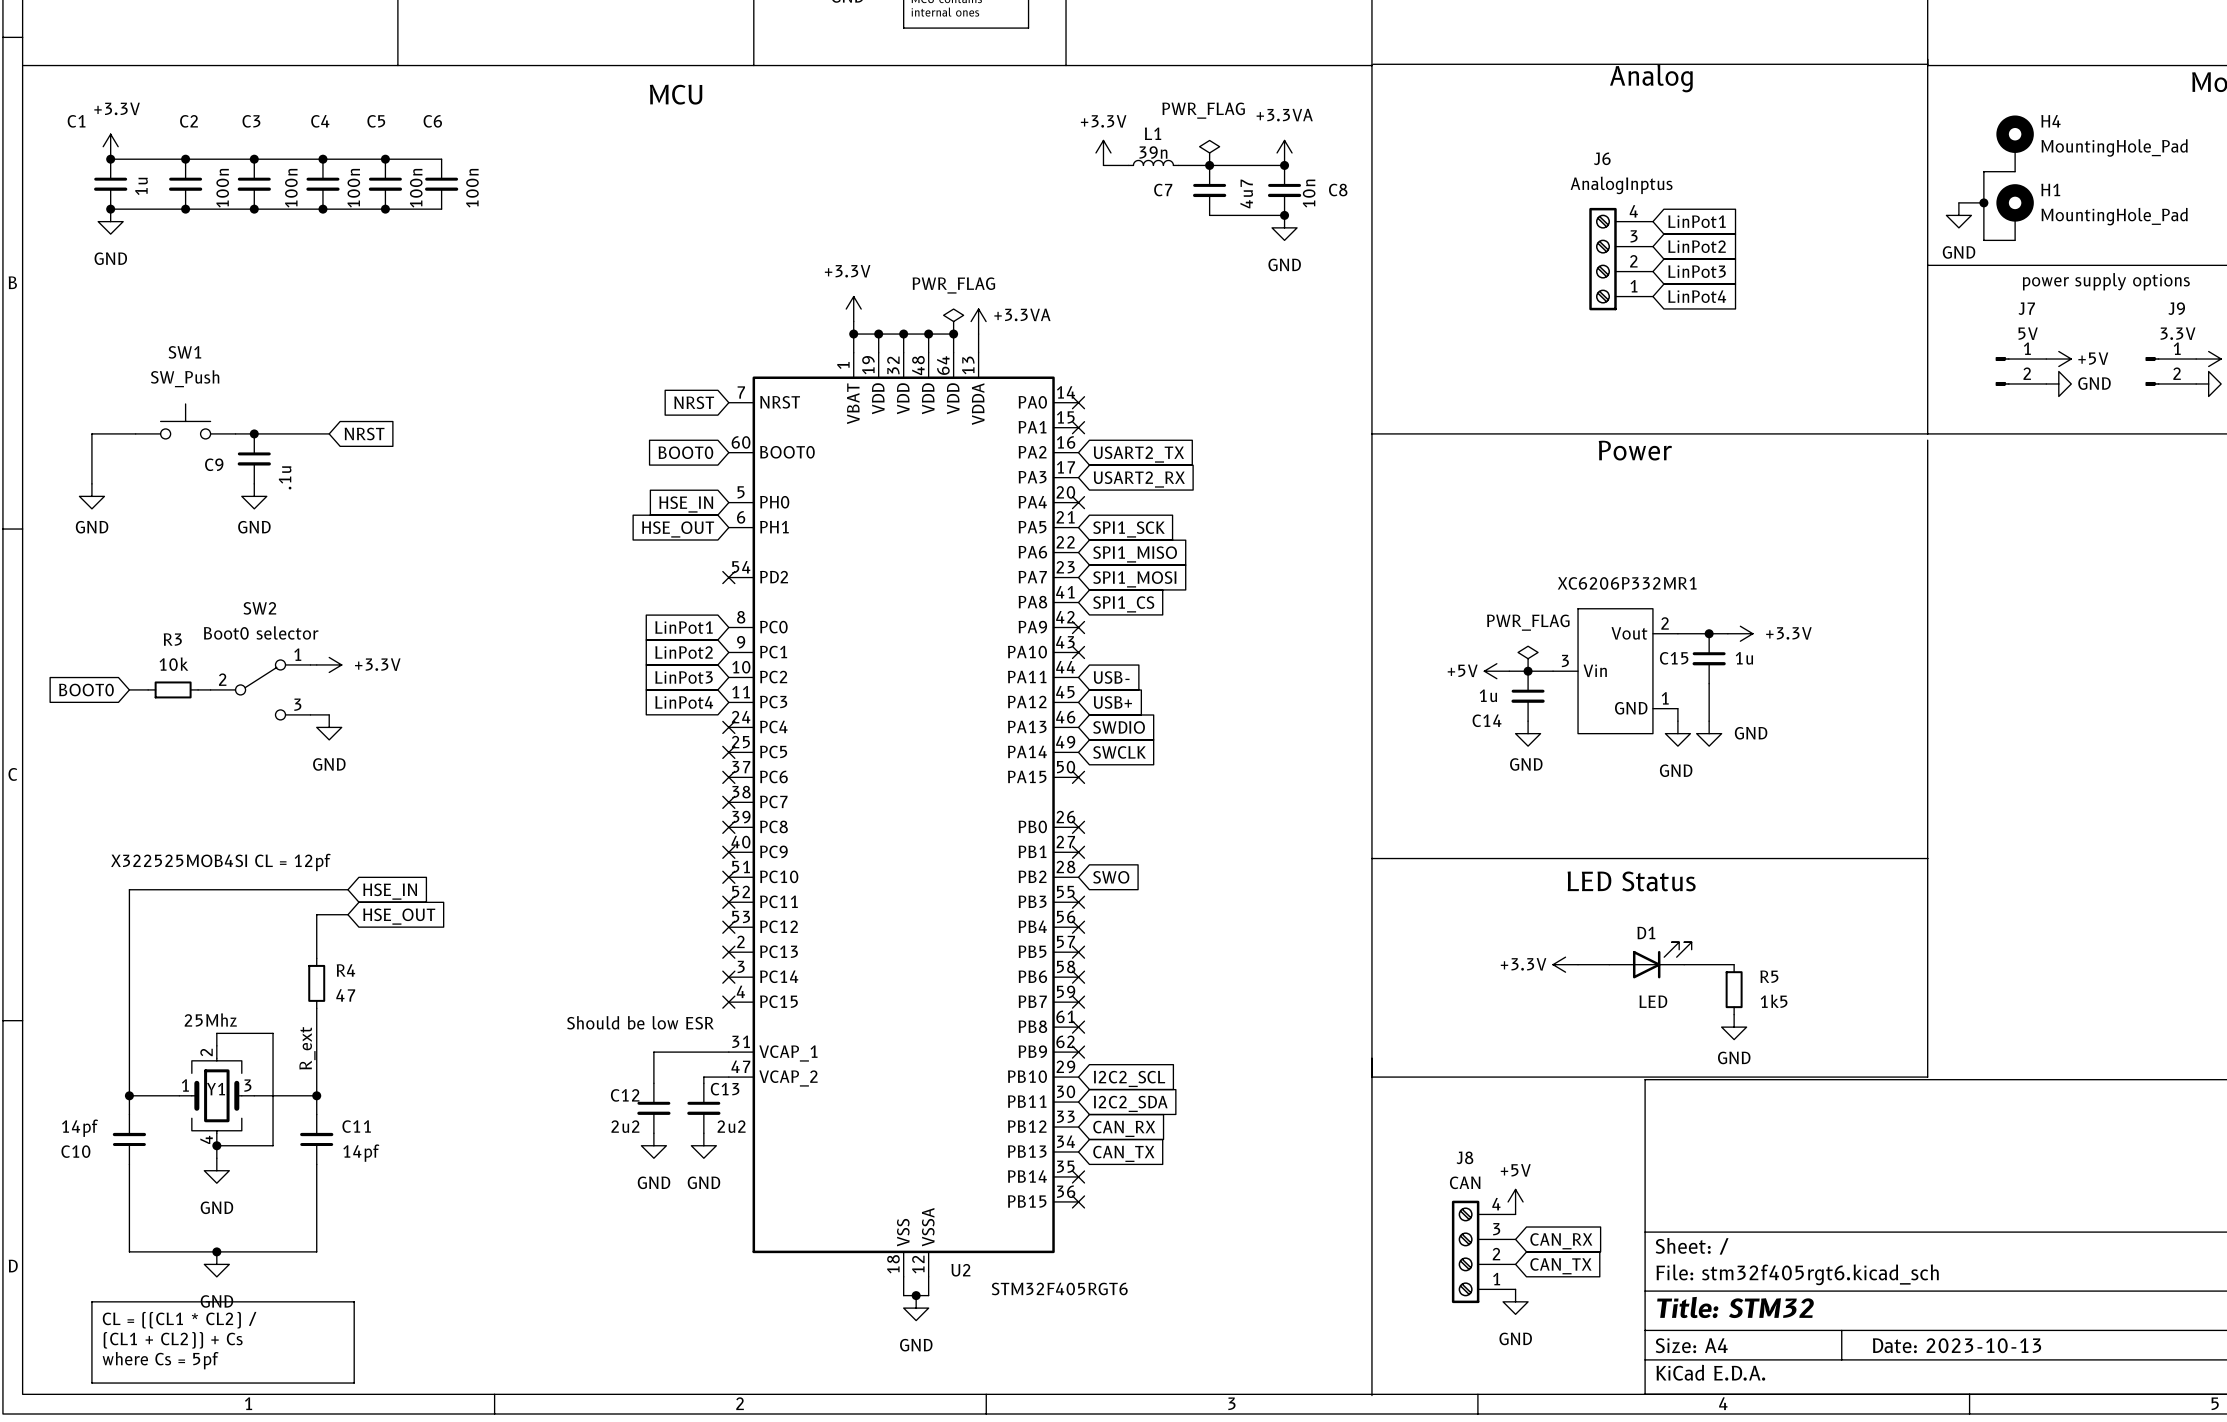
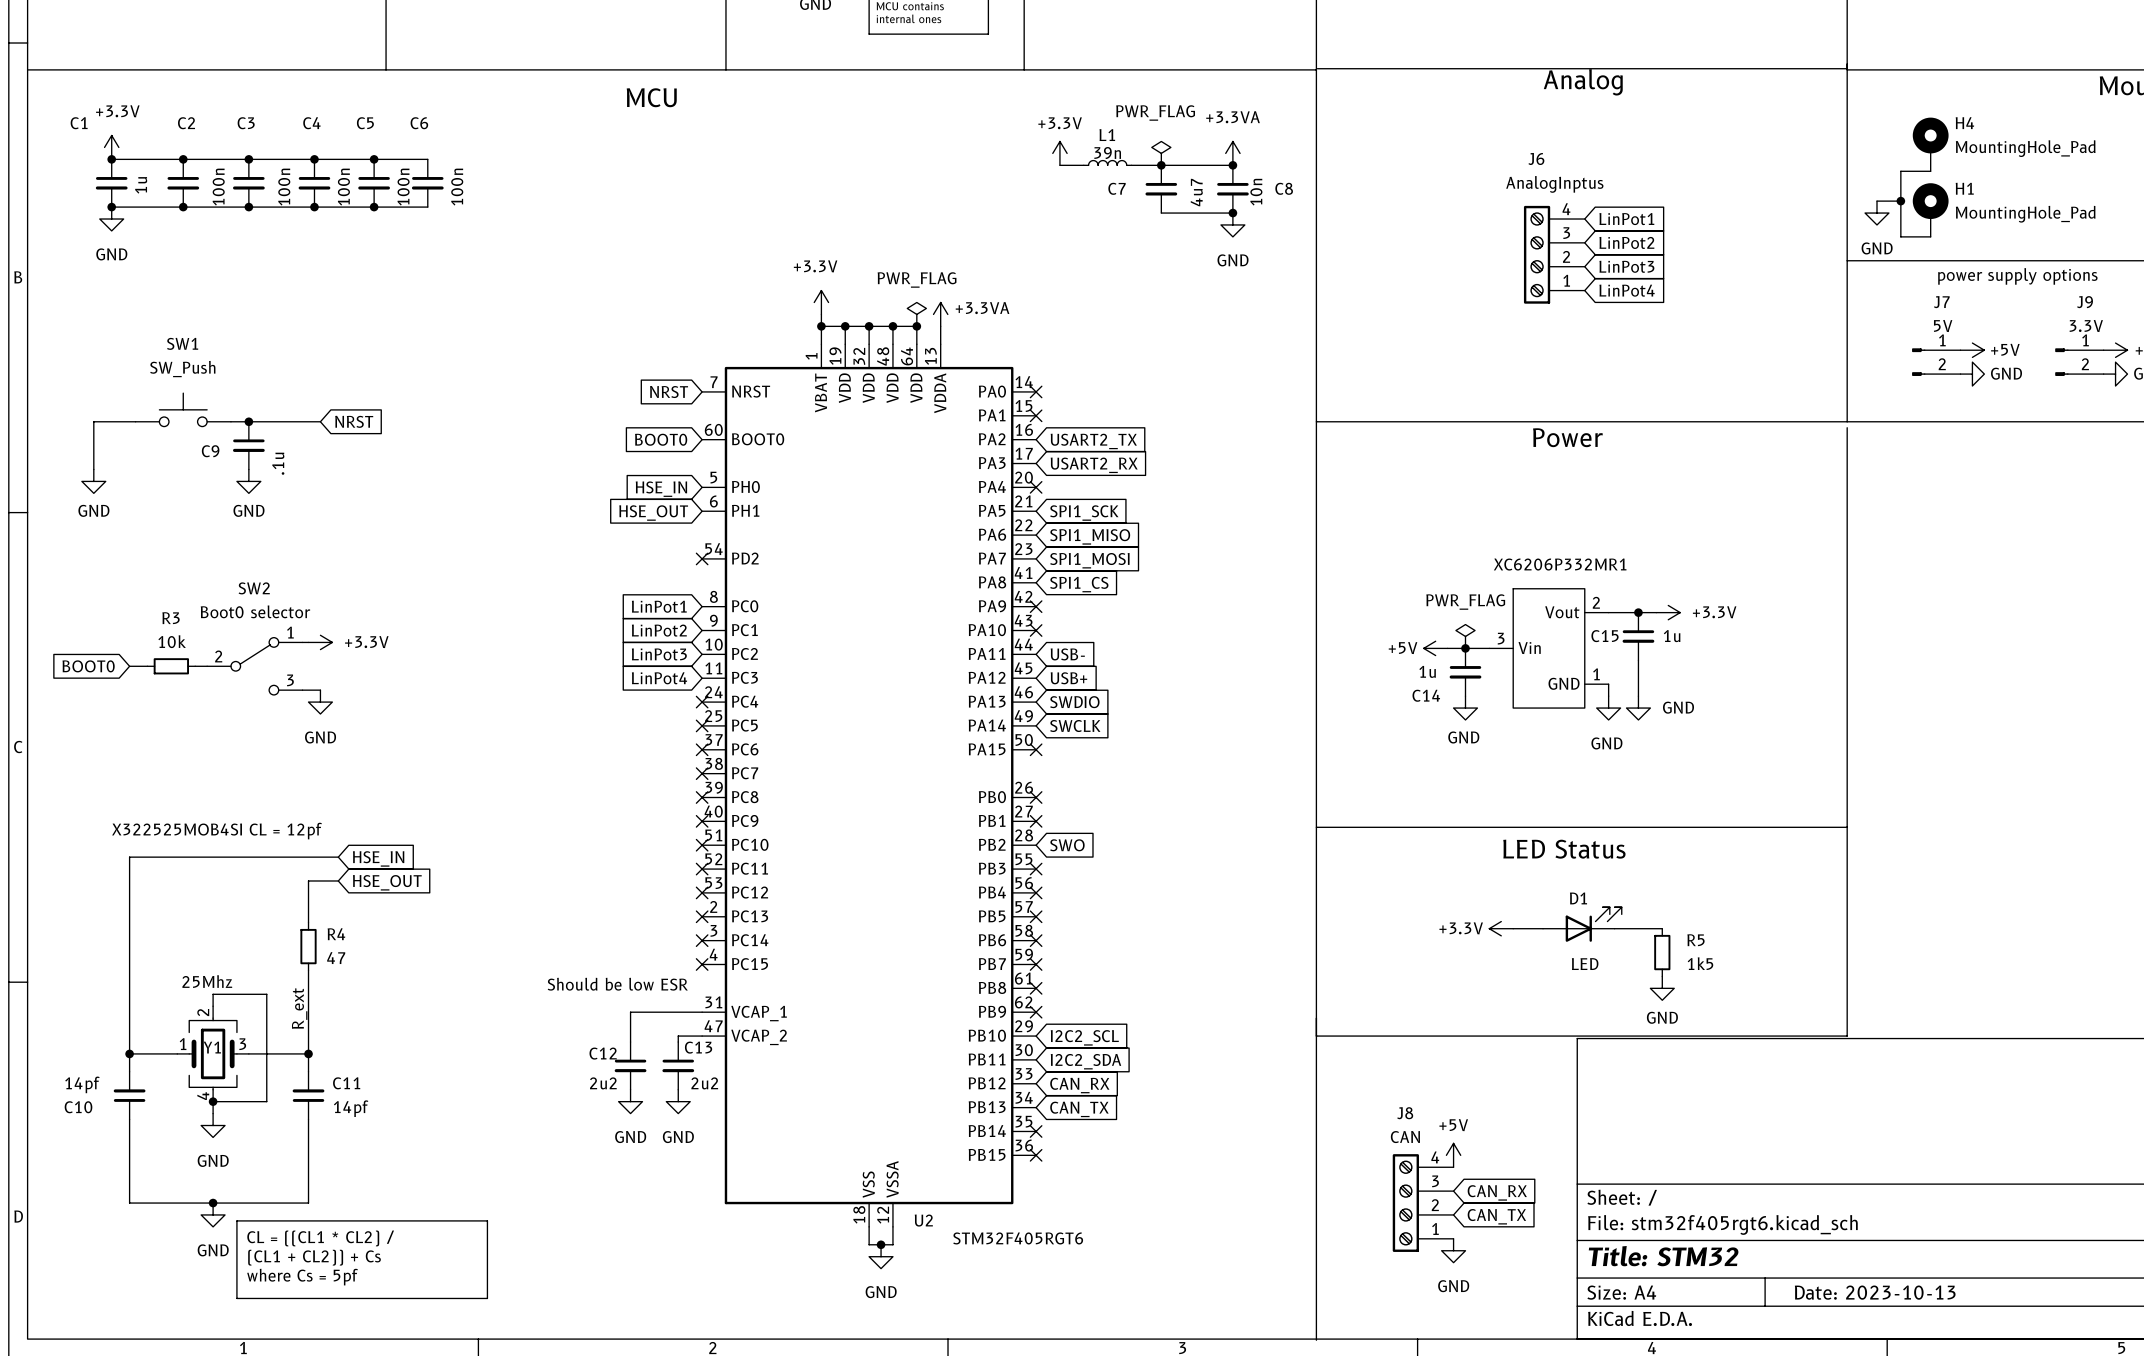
line: (91, 1301) (354, 1301) (354, 1383) (91, 1383) (91, 1301) -> (236, 1220) (487, 1220) (487, 1298) (236, 1298) (236, 1220)
text position: CL = ((CL1 * CL2) / (179, 1320) -> CL = ((CL1 * CL2) / (320, 1238)
text position: (CL1 + CL2)) + Cs (173, 1340) -> (CL1 + CL2)) + Cs (314, 1257)
text position: where Cs = 5pf (160, 1360) -> where Cs = 5pf (302, 1277)

